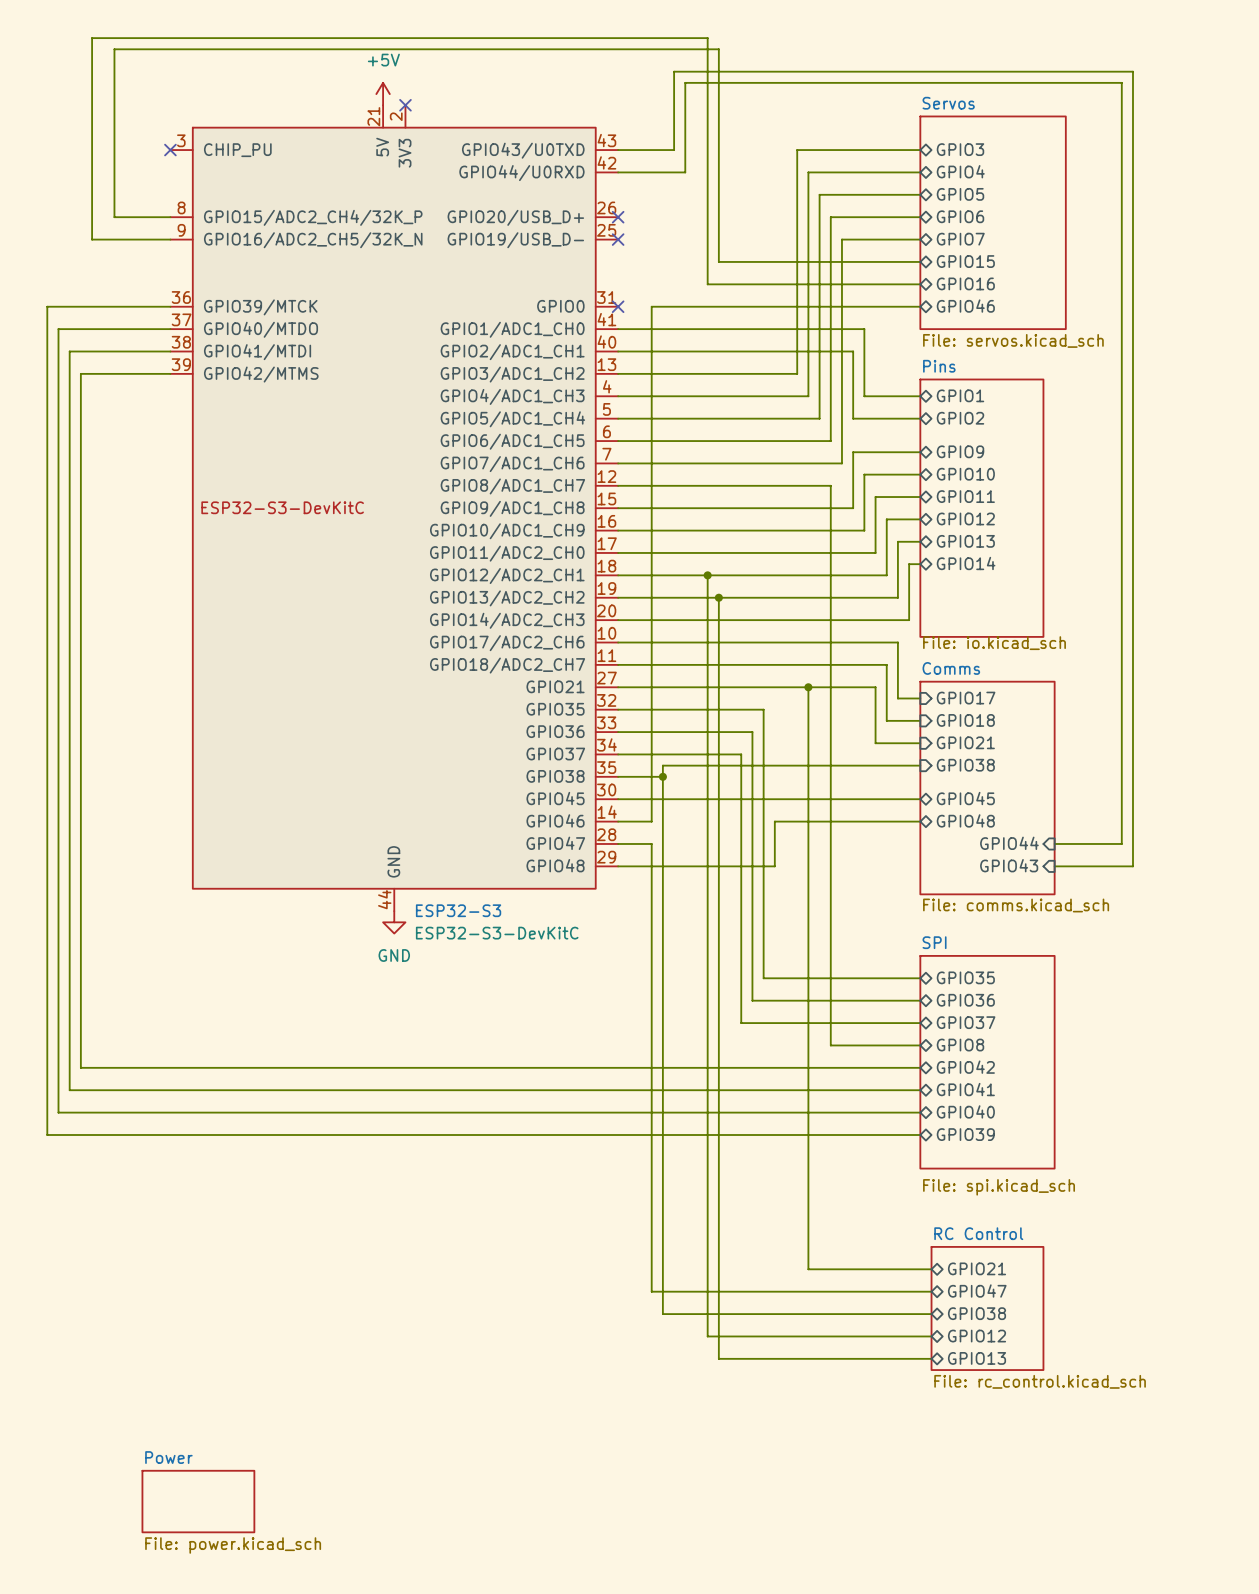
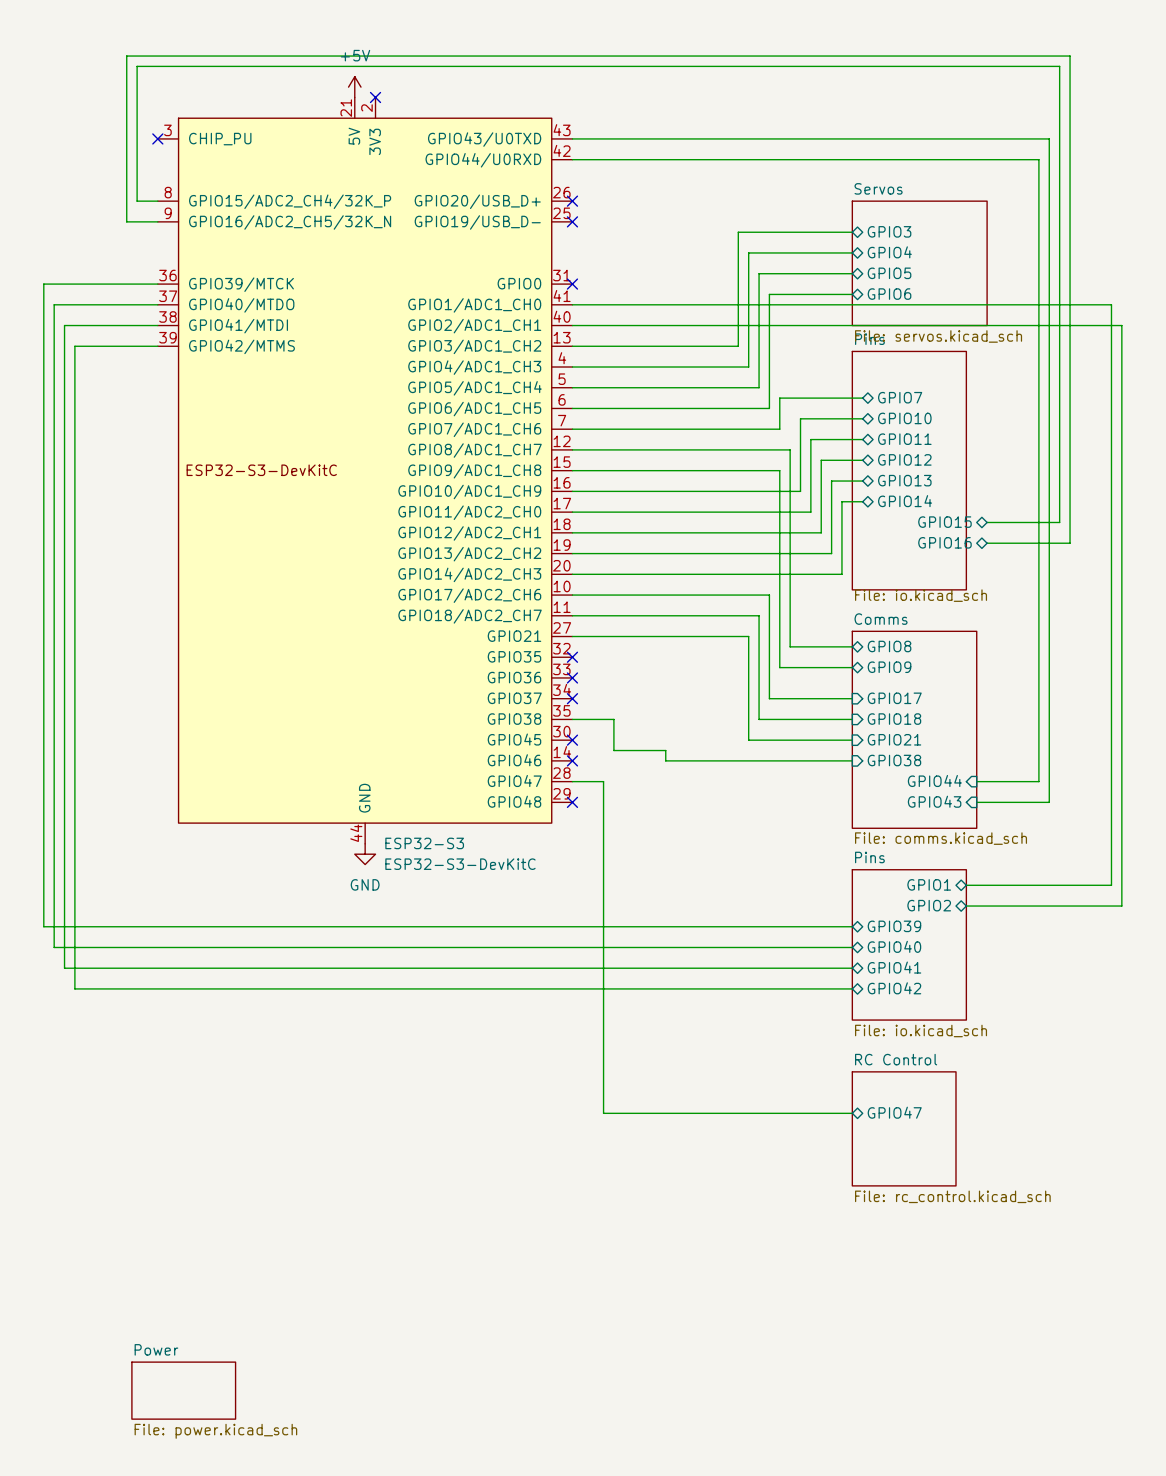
wire: (674, 71) (674, 150) -> (738, 138) (624, 138)
wire: (1132, 71) (1132, 150) -> (852, 138) (1049, 138)
wire: none -> (1049, 66) (1059, 66) (1059, 522) (987, 522)
sheet pin position: GPIO3 (960, 149) -> GPIO3 (889, 231)
wire: (797, 150) (797, 250) -> (852, 232) (738, 232)
sheet pin position: GPIO4 (960, 171) -> GPIO4 (889, 252)
wire: (685, 172) (685, 82) (1121, 82) (1121, 172) -> (852, 159) (1038, 159)
wire: none -> (634, 159) (748, 159)
wire: (808, 172) (808, 273) -> (852, 252) (748, 252)
wire: (920, 194) (819, 194) (819, 295) -> (852, 273) (759, 273)
sheet pin position: GPIO5 (960, 194) -> GPIO5 (889, 273)
sheet pin position: GPIO6 (960, 216) -> GPIO6 (889, 294)
wire: (148, 217) (114, 217) (114, 49) (718, 49) (718, 261) (920, 261) -> (137, 201) (137, 66) (624, 66)
wire: (920, 217) (830, 217) (830, 317) -> (852, 294) (769, 294)
sheet Servos: File: servos.kicad_sch (993, 222) -> none
wire: (136, 239) (92, 239) (92, 38) (707, 38) (707, 284) (920, 284) -> (126, 221) (126, 56) (1070, 56) (1070, 543) (987, 543)
wire: (920, 239) (841, 239) (841, 429) -> (862, 398) (779, 398)
sheet pin position: GPIO7 (960, 239) -> GPIO7 (900, 397)
sheet pin: GPIO15 (965, 261) -> none
sheet pin: GPIO16 (965, 283) -> none
sheet Servos: none -> File: servos.kicad_sch (919, 263)
wire: (920, 306) (651, 306) (651, 821) (618, 821) -> none
sheet pin: GPIO46 (965, 306) -> none
wire: (864, 329) (864, 396) (920, 396) -> (800, 304) (1111, 304) (1111, 885) (966, 885)
wire: (853, 351) (853, 418) (920, 418) -> (790, 325) (1121, 325) (1121, 906) (966, 906)
sheet pin: GPIO1 (960, 395) -> none
sheet pin: GPIO2 (960, 418) -> none
sheet pin: GPIO9 (960, 451) -> none
wire: (864, 452) (853, 452) (853, 485) -> (800, 418) (800, 439)
wire: none -> (852, 418) (862, 418)
wire: (864, 474) (875, 474) -> (810, 460) (810, 439)
wire: none -> (852, 439) (862, 439)
sheet pin position: GPIO10 (965, 474) -> GPIO10 (904, 418)
wire: (830, 485) (830, 642) (897, 642) (897, 698) -> (790, 470) (790, 646) (831, 646)
wire: none -> (769, 449) (790, 449)
sheet pin position: GPIO11 (965, 496) -> GPIO11 (904, 439)
wire: (875, 497) (886, 497) -> (821, 481) (821, 460)
wire: none -> (852, 460) (862, 460)
wire: (841, 508) (853, 508) -> (779, 470) (779, 667) (821, 667)
sheet pin position: GPIO12 (965, 518) -> GPIO12 (904, 459)
wire: (886, 519) (897, 519) -> (852, 481) (862, 481)
wire: (897, 541) (909, 541) -> (831, 501) (831, 481)
wire: none -> (852, 501) (862, 501)
sheet pin position: GPIO13 (965, 541) -> GPIO13 (904, 480)
sheet pin position: GPIO14 (966, 563) -> GPIO14 (905, 501)
sheet pin: none -> GPIO15 (944, 522)
wire: (909, 564) (920, 564) -> (841, 522) (841, 501)
wire: (707, 575) (707, 1336) (931, 1336) -> none
junction: (707, 575) -> none
sheet pin: none -> GPIO16 (944, 542)
wire: (718, 597) (718, 810) -> (613, 750) (665, 750)
junction: (718, 597) -> none
wire: (819, 664) (886, 664) (886, 720) -> (759, 615) (759, 719) (852, 719)
wire: (808, 687) (875, 687) (875, 743) (920, 743) -> none
junction: (808, 687) -> none
sheet pin shape: input (966, 698) -> bidirectional (889, 646)
sheet pin: GPIO17 (966, 698) -> GPIO8 (889, 646)
wire: (618, 709) (763, 709) (763, 978) (920, 978) -> none
no-connect mark: none -> (572, 657)
sheet pin shape: input (965, 720) -> bidirectional (889, 667)
sheet pin: GPIO18 (965, 720) -> GPIO9 (889, 667)
wire: (618, 732) (752, 732) (752, 1000) -> none
no-connect mark: none -> (572, 677)
sheet pin: GPIO21 (965, 742) -> none
wire: (618, 754) (741, 754) (741, 1023) -> none
no-connect mark: none -> (572, 698)
wire: (830, 754) (830, 1045) -> (769, 698) (852, 698)
sheet pin: none -> GPIO17 (894, 698)
wire: (920, 765) (662, 765) (662, 776) -> none
sheet pin: GPIO38 (965, 765) -> none
junction: (662, 776) -> none
sheet pin: none -> GPIO18 (894, 719)
sheet pin shape: bidirectional (965, 798) -> input (894, 739)
sheet pin: GPIO45 (965, 798) -> GPIO21 (894, 739)
wire: (618, 799) (808, 799) (808, 1269) (931, 1269) -> none
no-connect mark: none -> (572, 740)
wire: (662, 810) (662, 1314) (931, 1314) -> none
sheet pin shape: bidirectional (965, 820) -> input (894, 760)
sheet pin: GPIO48 (965, 820) -> GPIO38 (894, 760)
no-connect mark: none -> (572, 760)
wire: (718, 821) (718, 1358) (931, 1358) -> none
wire: (774, 821) (774, 866) (618, 866) -> (717, 760) (665, 760)
no-connect mark: none -> (572, 802)
sheet pin: none -> GPIO1 (929, 884)
sheet pin: GPIO35 (965, 977) -> none
sheet pin: none -> GPIO2 (929, 905)
wire: (47, 1000) (47, 1134) (920, 1134) -> (43, 926) (696, 926)
sheet pin: GPIO36 (965, 1000) -> GPIO39 (894, 926)
sheet Pins: none -> File: io.kicad_sch (909, 944)
sheet pin: GPIO37 (966, 1022) -> GPIO40 (894, 946)
wire: (58, 1023) (58, 1112) (920, 1112) -> (54, 947) (686, 947)
wire: (69, 1045) (69, 1090) (920, 1090) -> (64, 968) (769, 968)
sheet pin: GPIO8 (960, 1045) -> GPIO41 (894, 967)
sheet SPI: File: spi.kicad_sch (987, 1062) -> none
sheet pin: GPIO41 (965, 1089) -> none
sheet pin: GPIO40 (965, 1111) -> none
sheet pin: GPIO39 (965, 1134) -> none
wire: (651, 1202) (651, 1291) (931, 1291) -> (603, 1113) (852, 1113)
sheet pin: GPIO21 (977, 1268) -> none
sheet pin position: GPIO47 (977, 1291) -> GPIO47 (894, 1112)
sheet RC Control position: (987, 1308) -> (904, 1128)
sheet pin: GPIO38 (977, 1313) -> none
sheet pin: GPIO12 (977, 1336) -> none
sheet pin: GPIO13 (977, 1358) -> none

